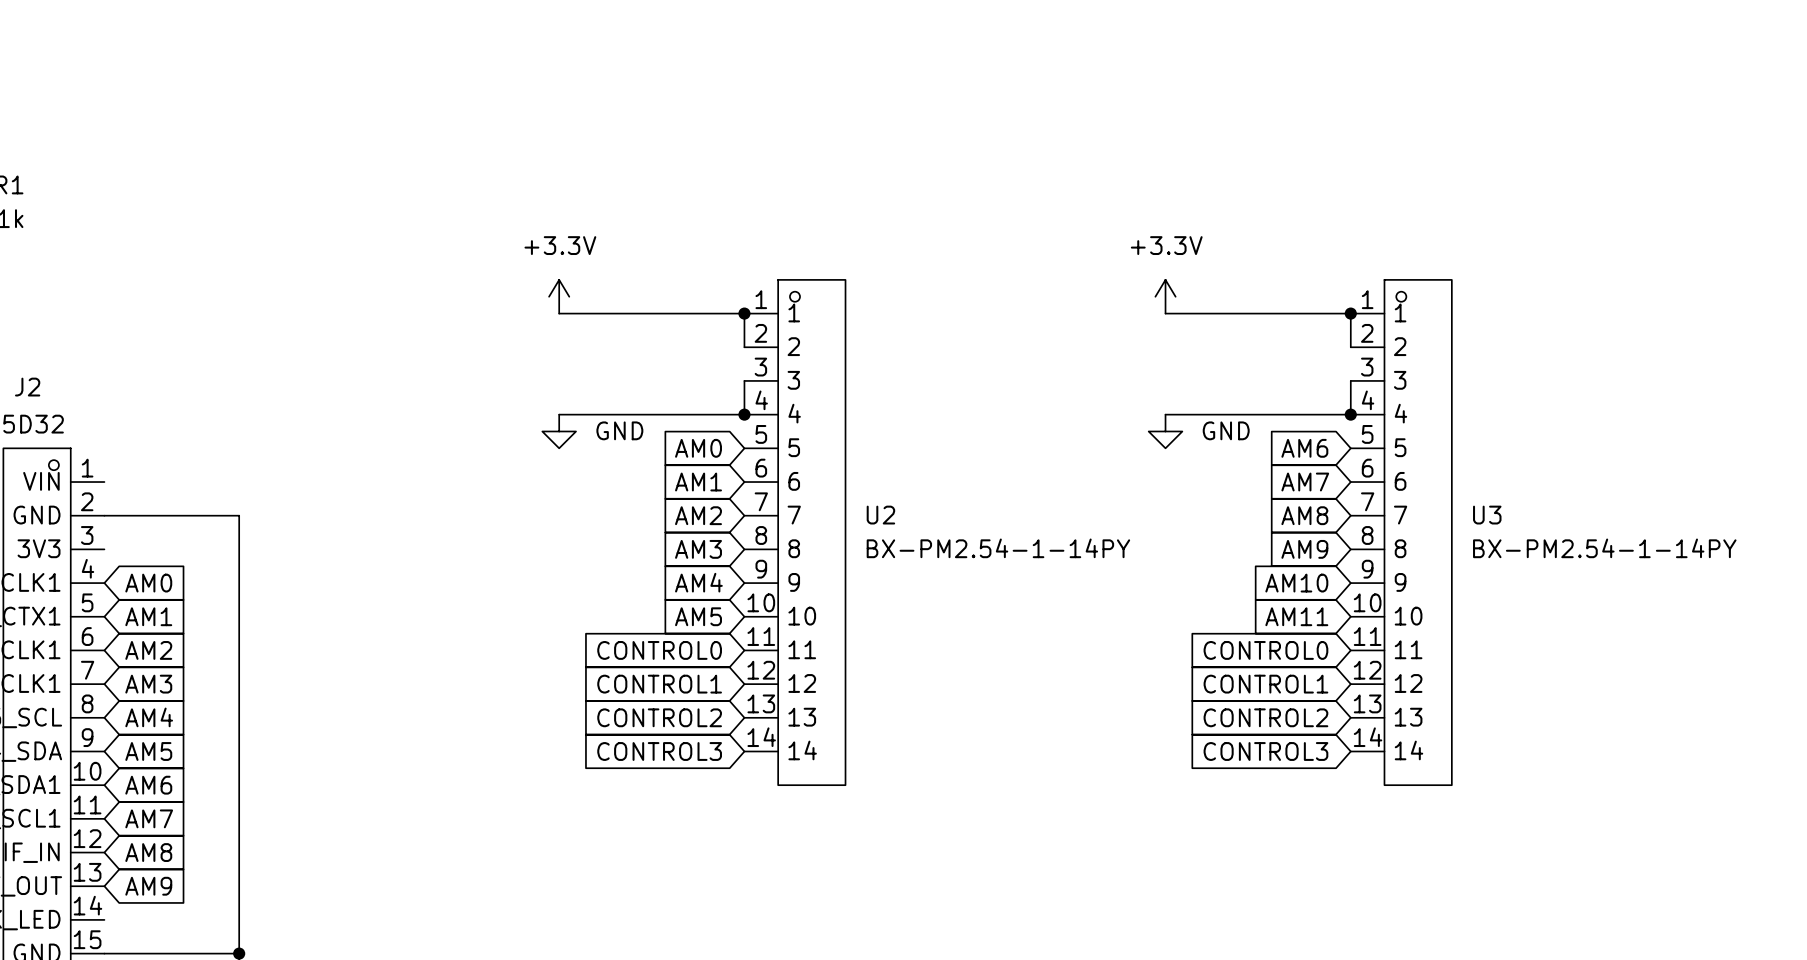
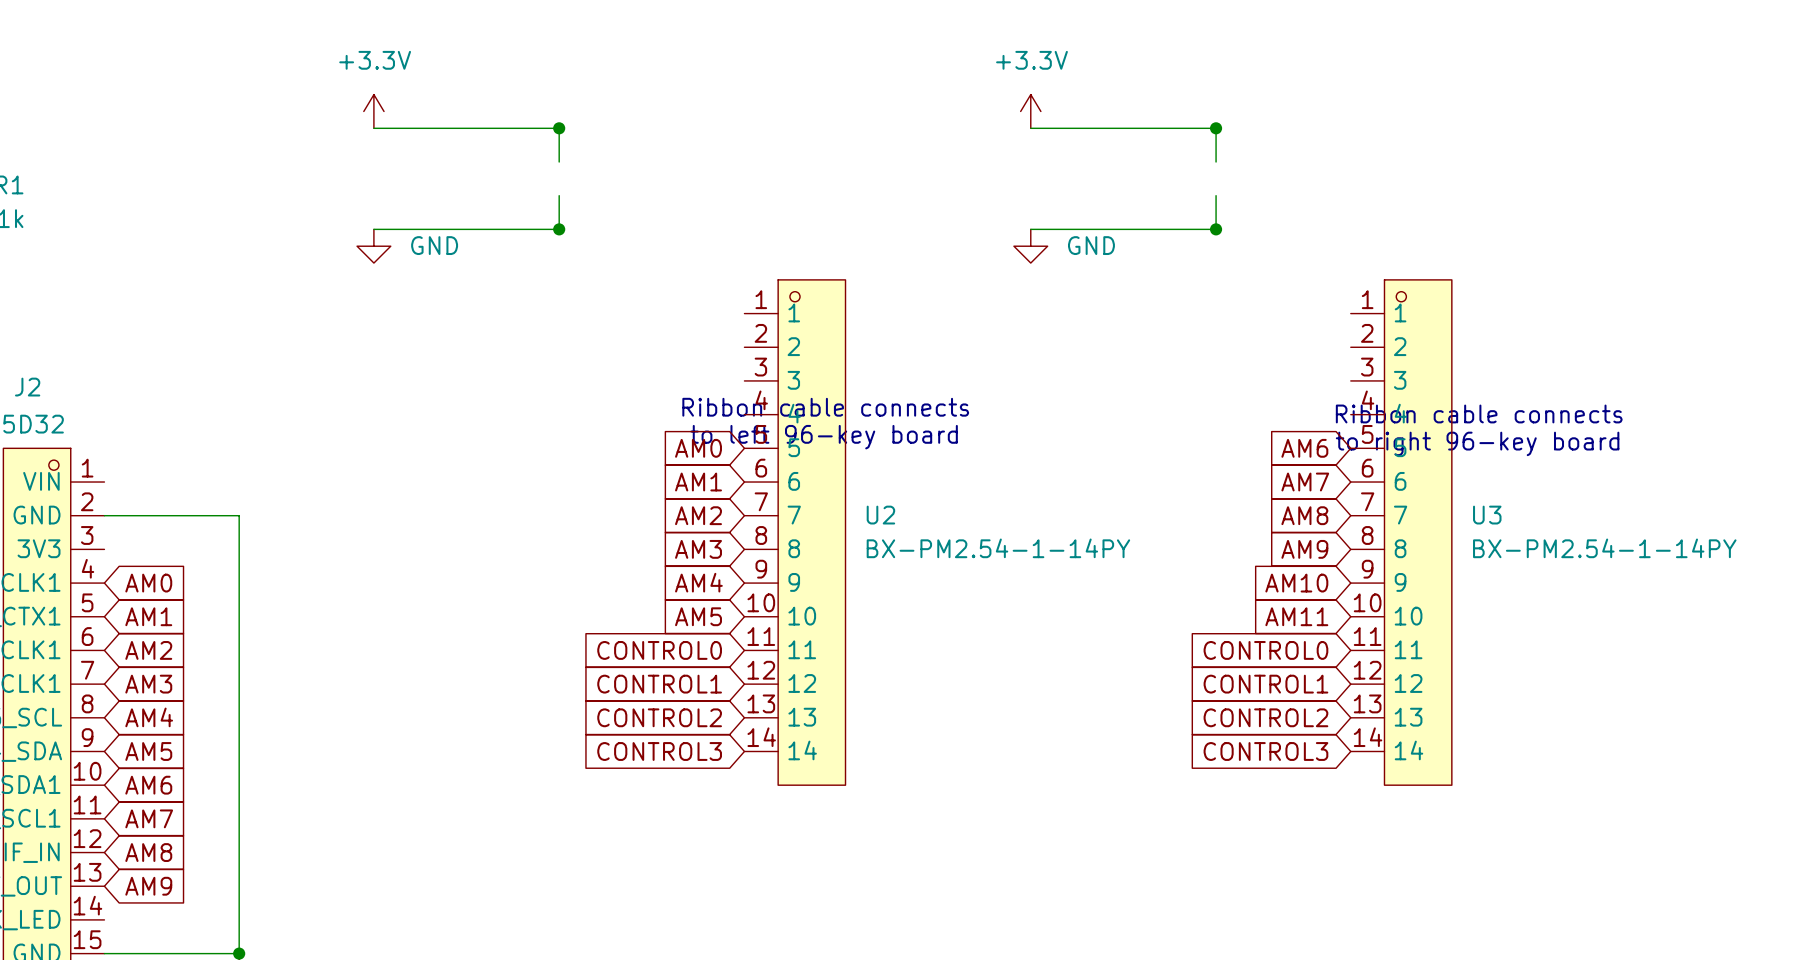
power symbol: none -> +3.3V (373, 111)
junction: none -> (559, 128)
junction: none -> (1216, 128)
junction: none -> (559, 229)
junction: none -> (1216, 229)
power symbol: none -> GND (373, 246)
power symbol: +3.3V (559, 296) -> none
power symbol position: +3.3V (1165, 296) -> +3.3V (1030, 111)
wire: (559, 313) (744, 313) (744, 347) -> (373, 128) (559, 128) (559, 162)
junction: (744, 313) -> none
wire: (1165, 313) (1350, 313) (1350, 347) -> (1030, 128) (1216, 128) (1216, 162)
junction: (1350, 313) -> none
wire: (744, 380) (744, 414) (559, 414) -> (559, 195) (559, 229) (373, 229)
wire: (1350, 380) (1350, 414) (1165, 414) -> (1216, 195) (1216, 229) (1030, 229)
text: none -> Ribbon cable connects (825, 407)
text: none -> Ribbon cable connects (1479, 413)
junction: (744, 414) -> none
junction: (1350, 414) -> none
power symbol: GND (559, 431) -> none
power symbol position: GND (1165, 431) -> GND (1030, 246)
text: none -> to left 96-key board (824, 437)
text: none -> to right 96-key board (1477, 443)

